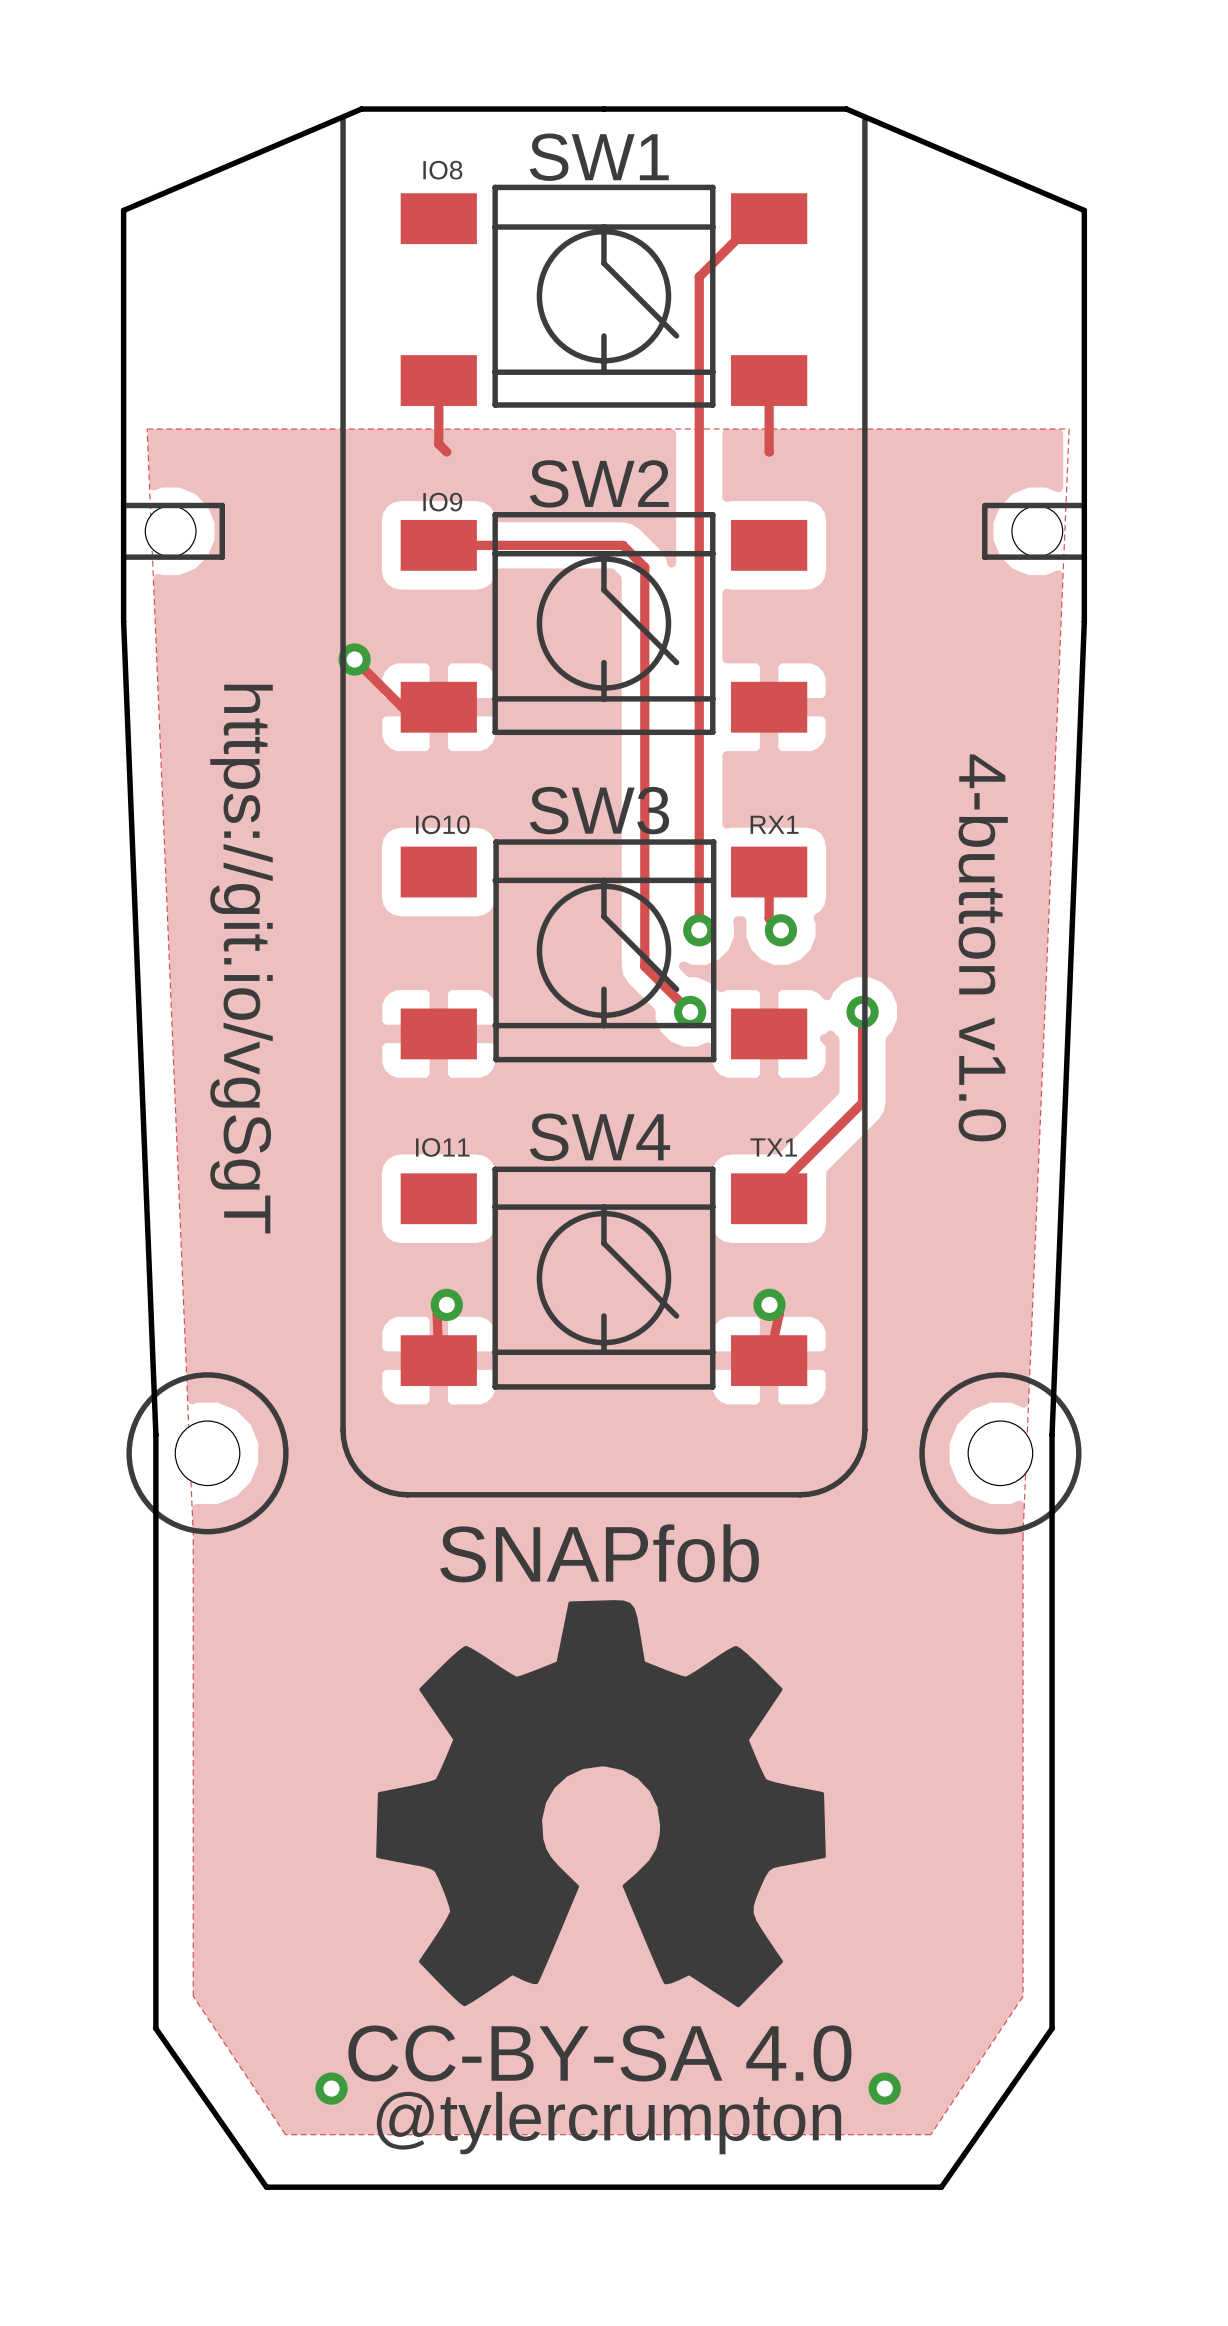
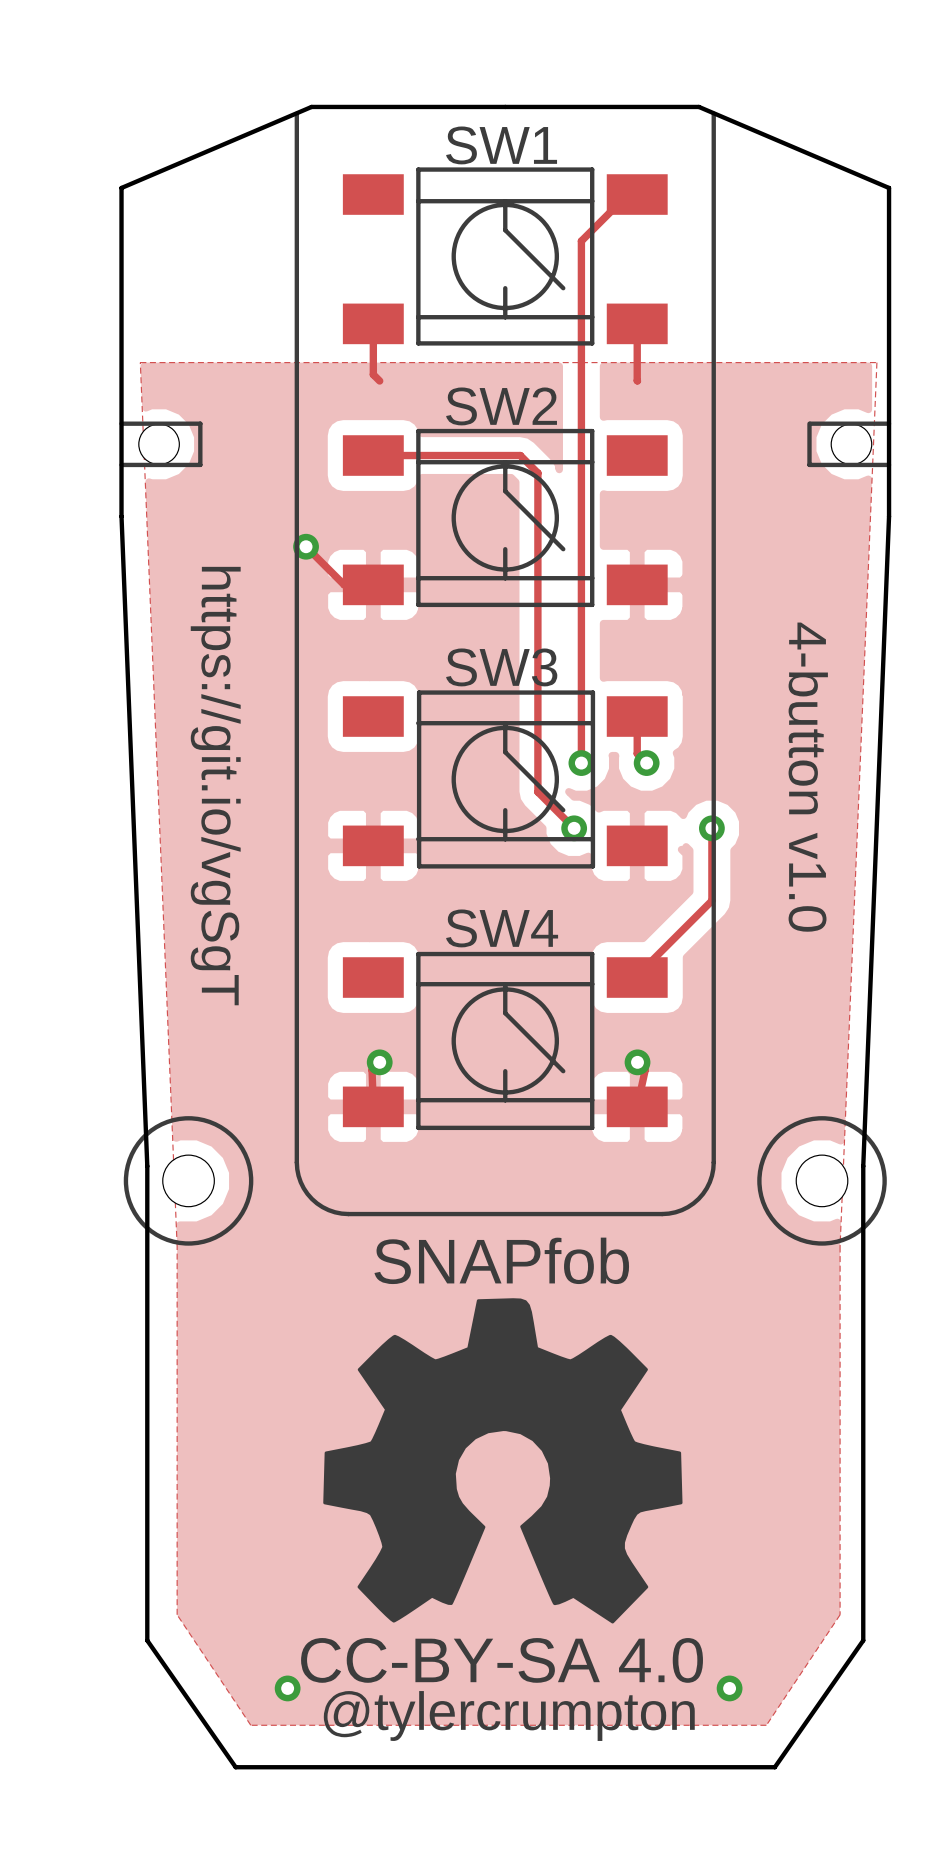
text: IO8 (442, 170) -> none
text: IO9 (442, 502) -> none
text: IO10 (442, 824) -> none
text: RX1 (774, 824) -> none
text: IO11 (442, 1147) -> none
text: TX1 (773, 1147) -> none

